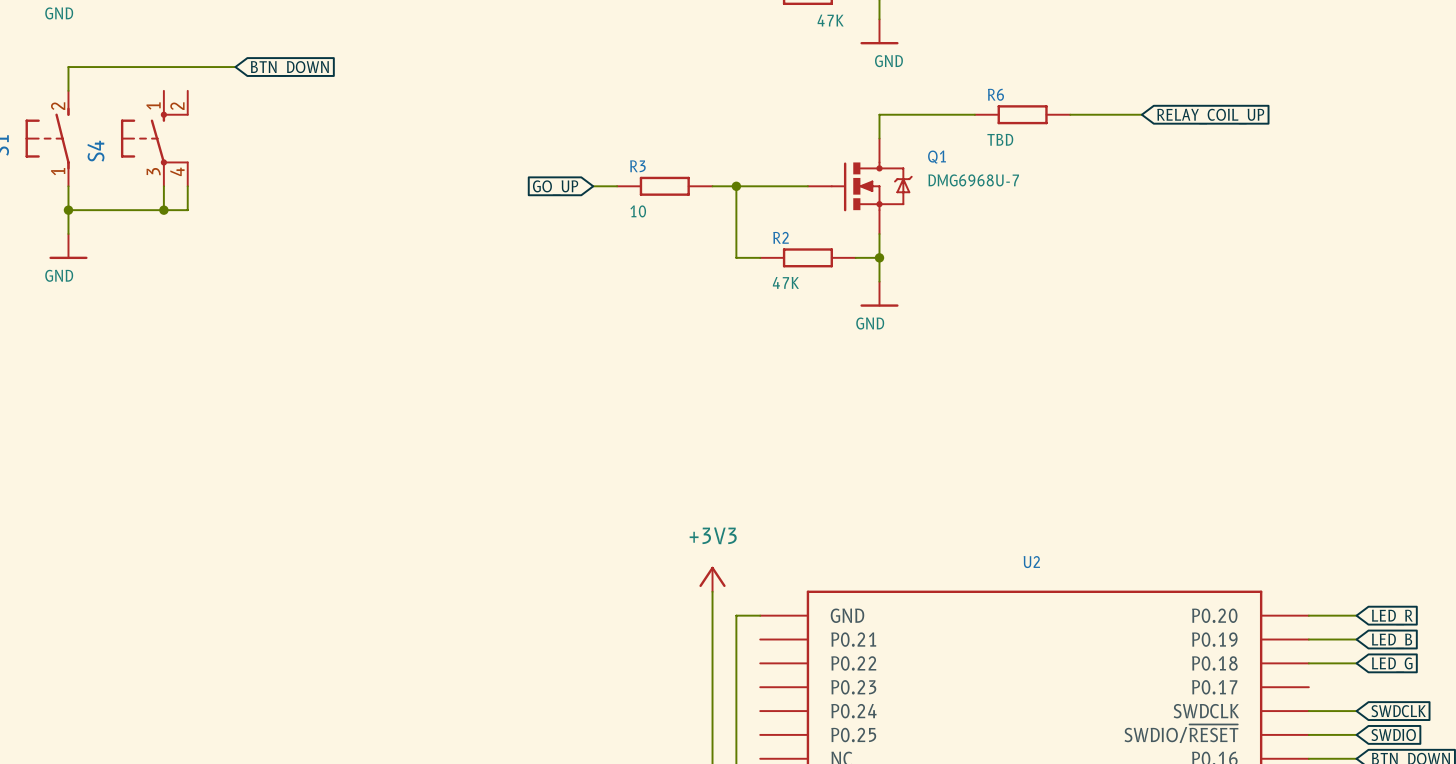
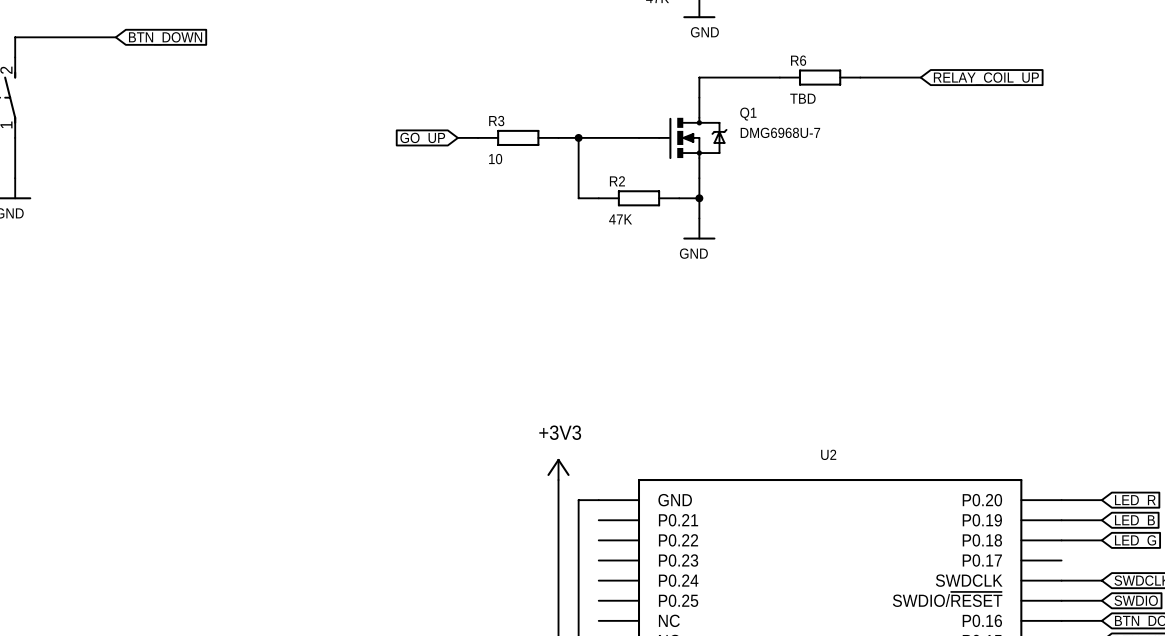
wire: (187, 67) (235, 67) -> none
global label position: BTN_DOWN (289, 68) -> BTN_DOWN (165, 38)
S4: (154, 138) -> none
wire: (163, 186) (163, 210) -> none
wire: (187, 186) (187, 210) (68, 210) -> none
junction: (68, 210) -> none
junction: (163, 210) -> none

